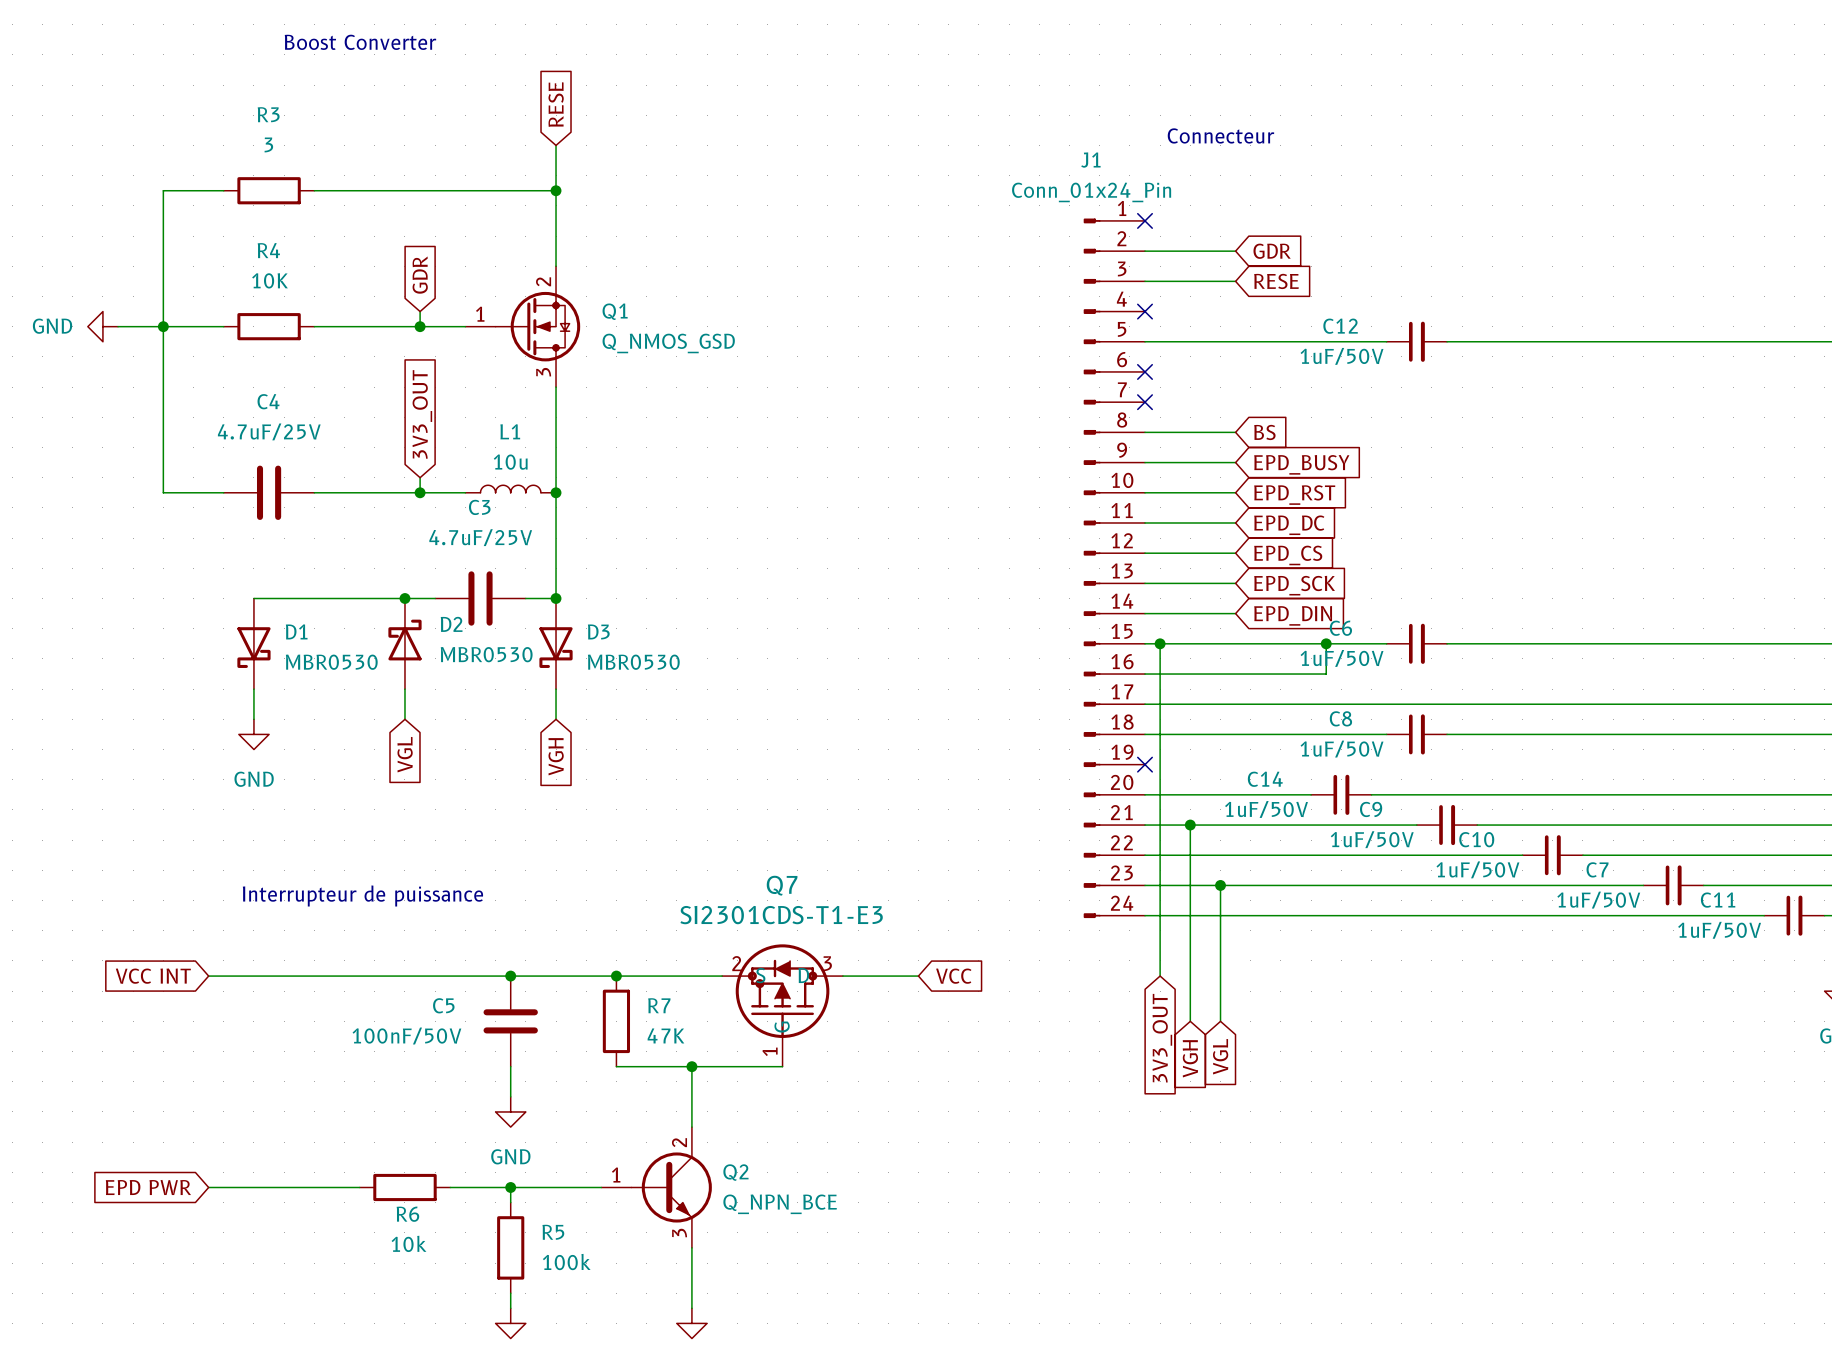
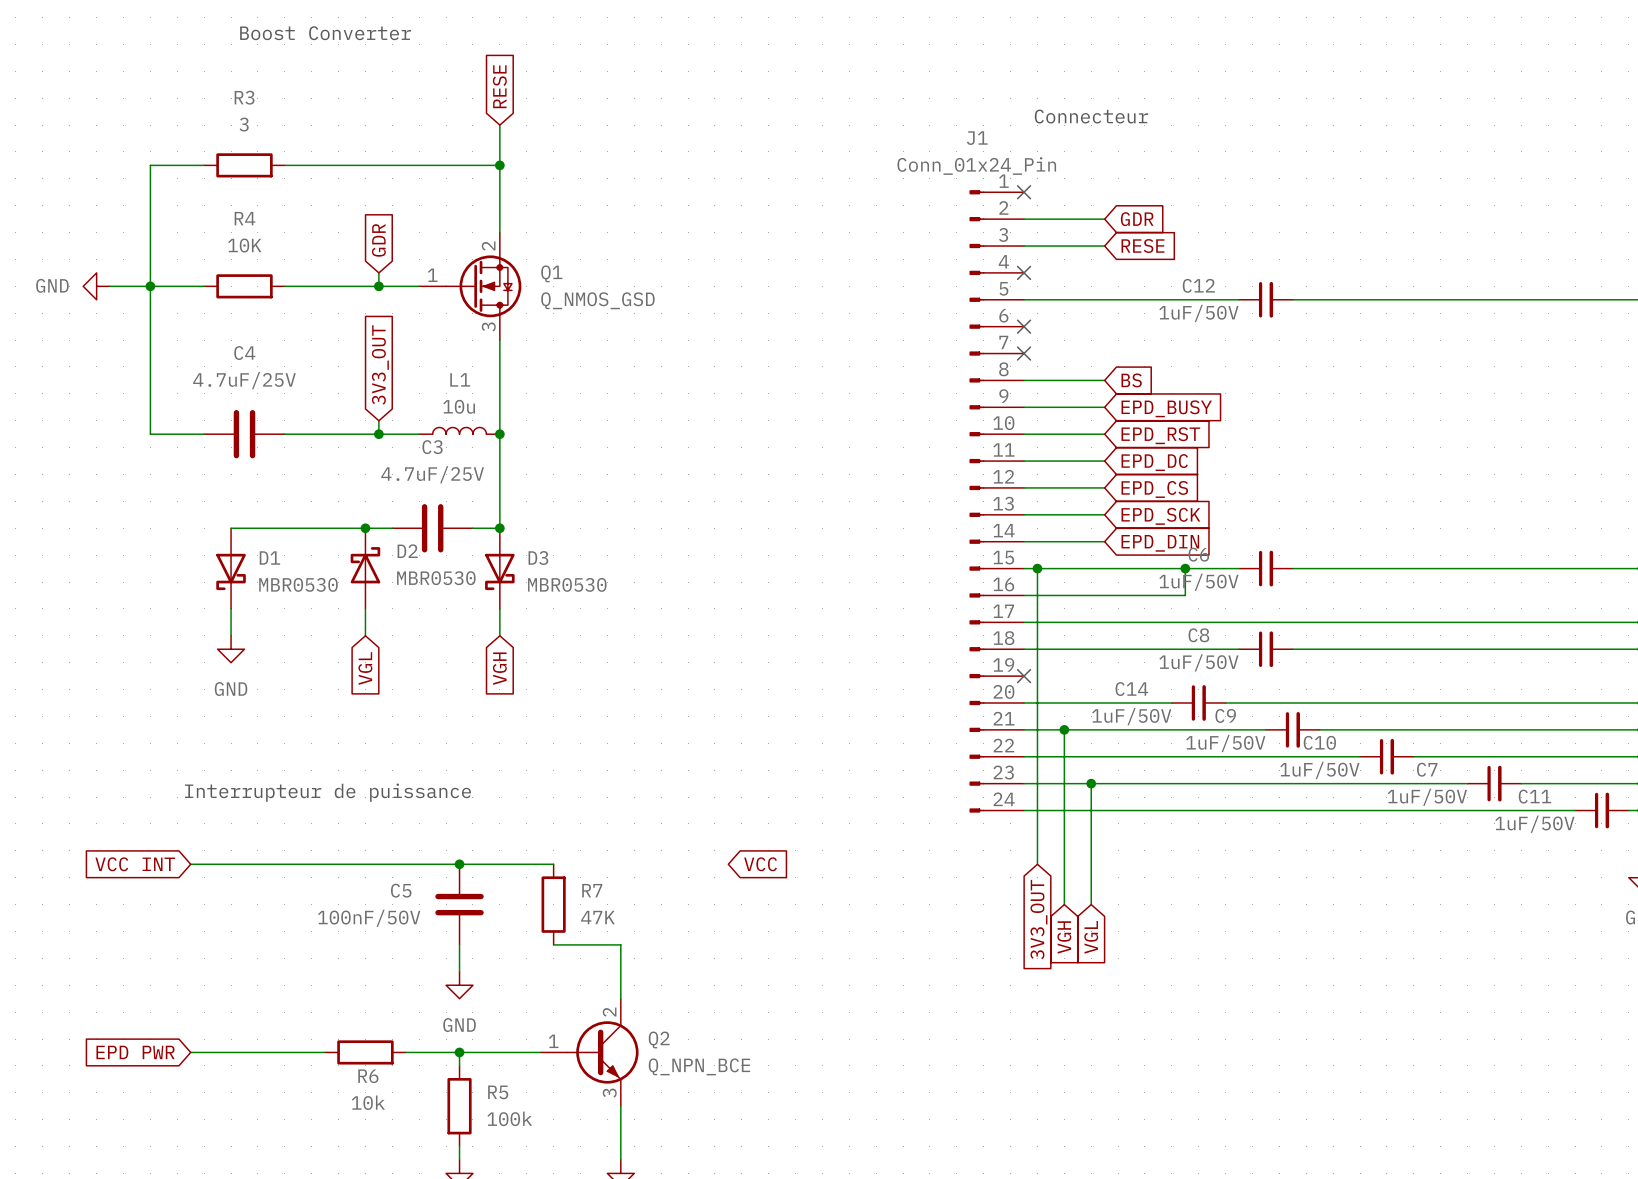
wire: (616, 976) (722, 976) -> none
junction: (616, 976) -> none
wire: (842, 976) (918, 976) -> none
global label position: VCC (953, 976) -> VCC (760, 864)
Q7: SI2301CDS-T1-E3 (782, 1005) -> none
wire: (691, 1066) (782, 1066) -> none
junction: (691, 1066) -> none

